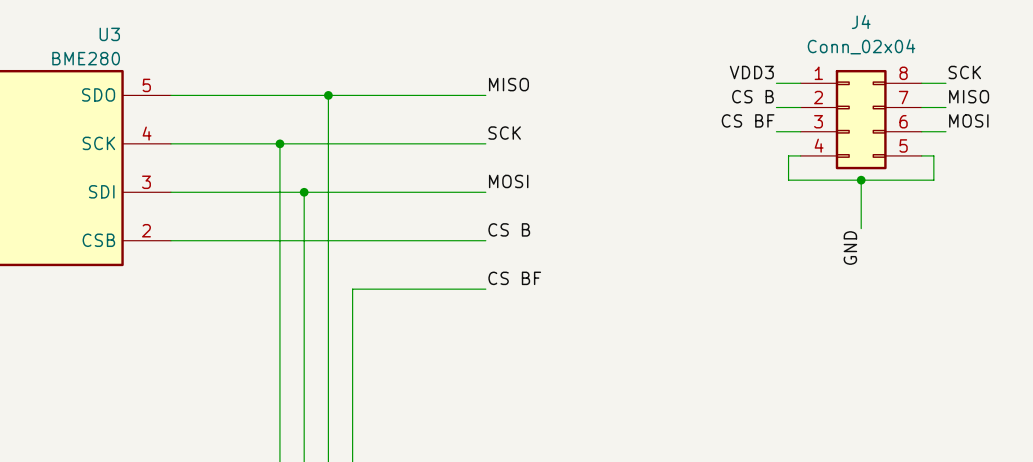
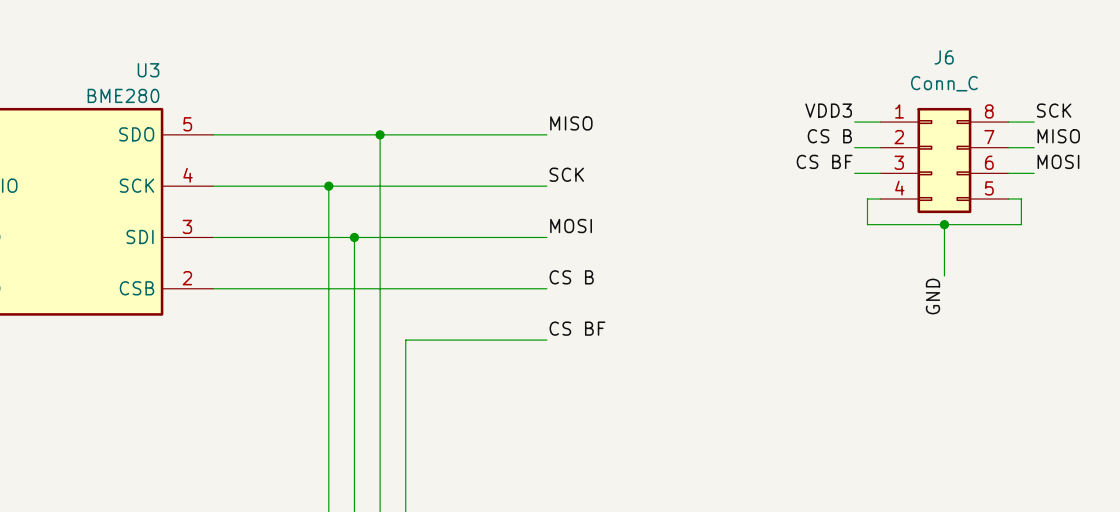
J4 name: J4 (861, 22) -> J6 (944, 57)
J4 value: Conn_02x04 (861, 46) -> Conn_C (944, 83)

